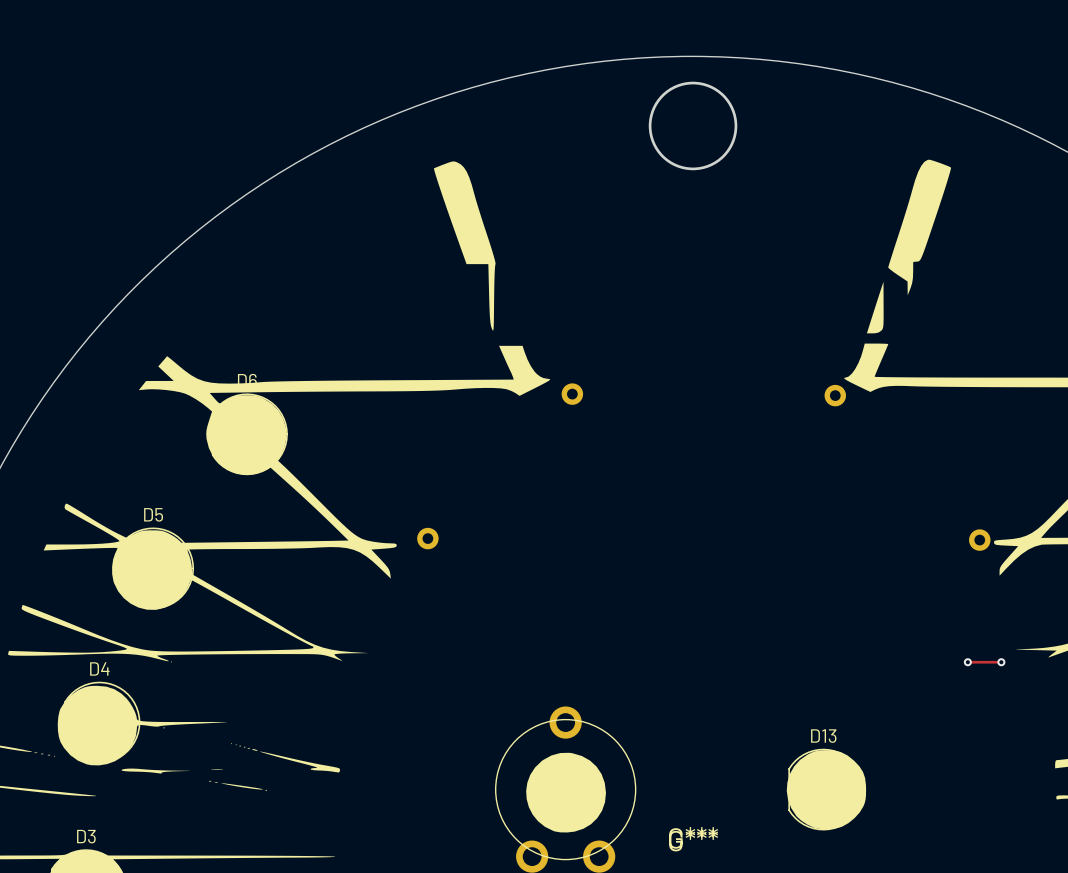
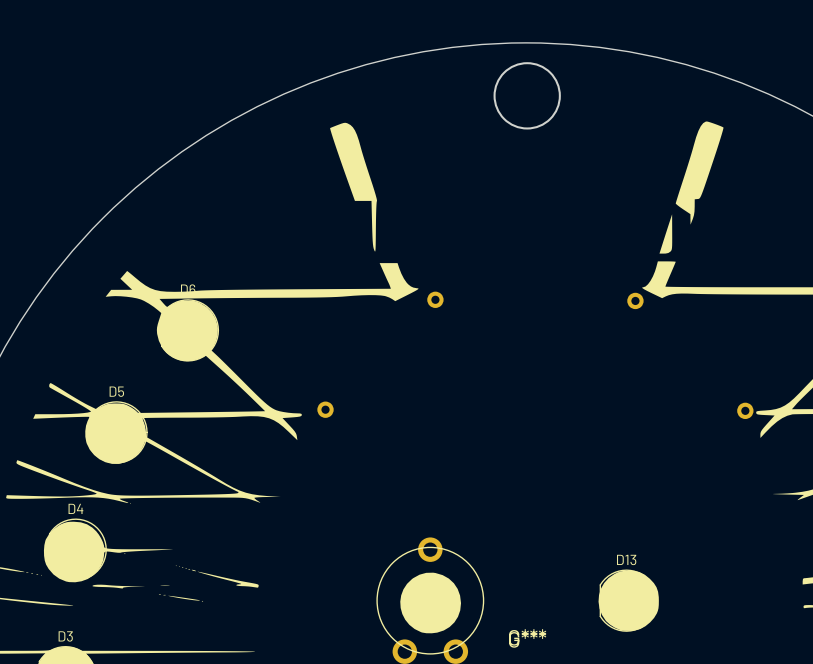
track: (967, 662) (1001, 662) -> none
via: (967, 662) -> none
via: (1001, 662) -> none

